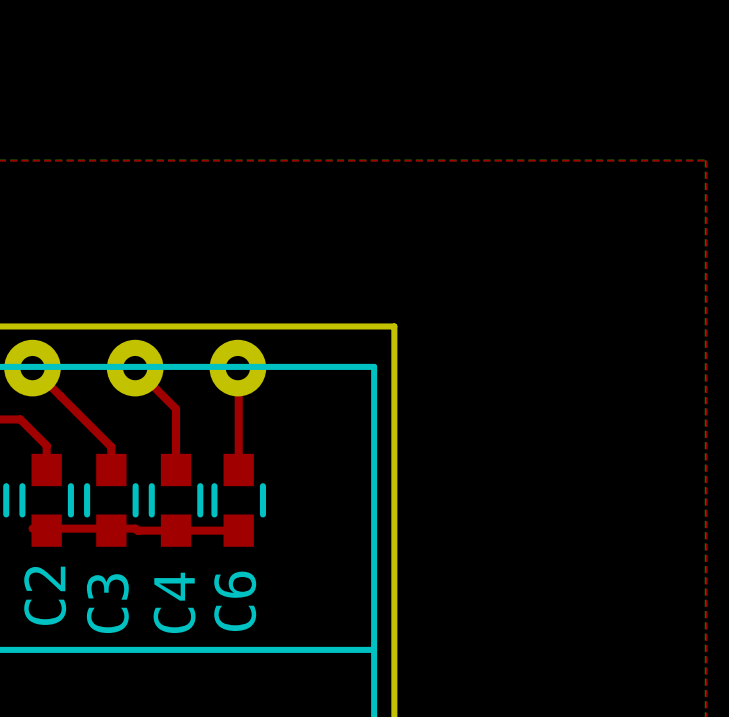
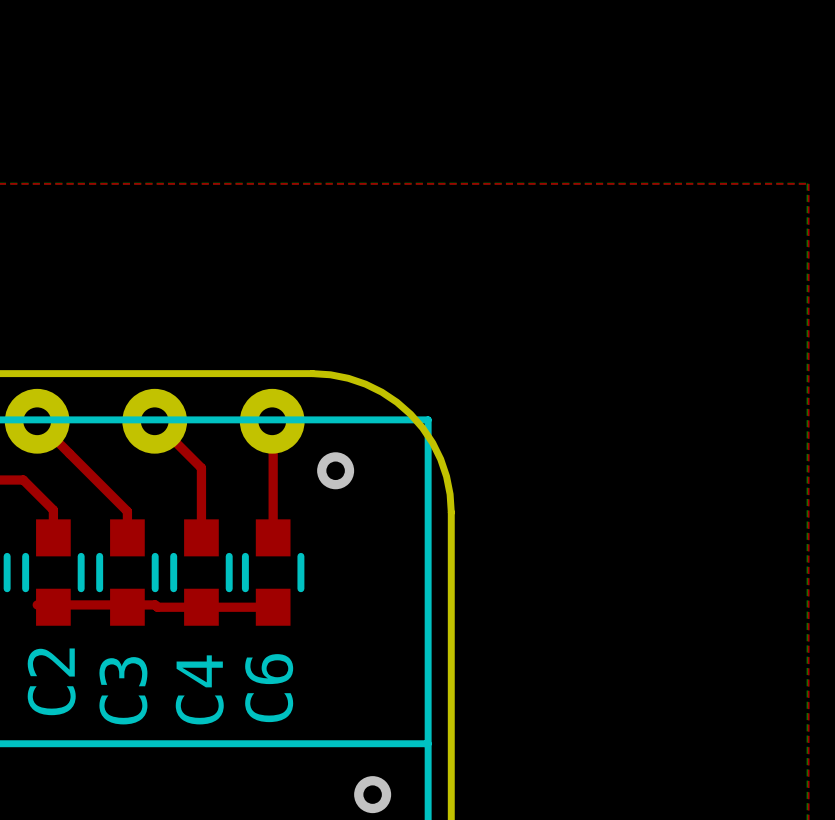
board edge: (273, 326) (394, 326) (394, 447) -> (312, 373) (330, 374) (365, 384) (381, 392) (410, 414) (432, 443) (440, 459) (450, 494) (451, 512)
via: none -> (335, 470)
via: none -> (372, 794)

